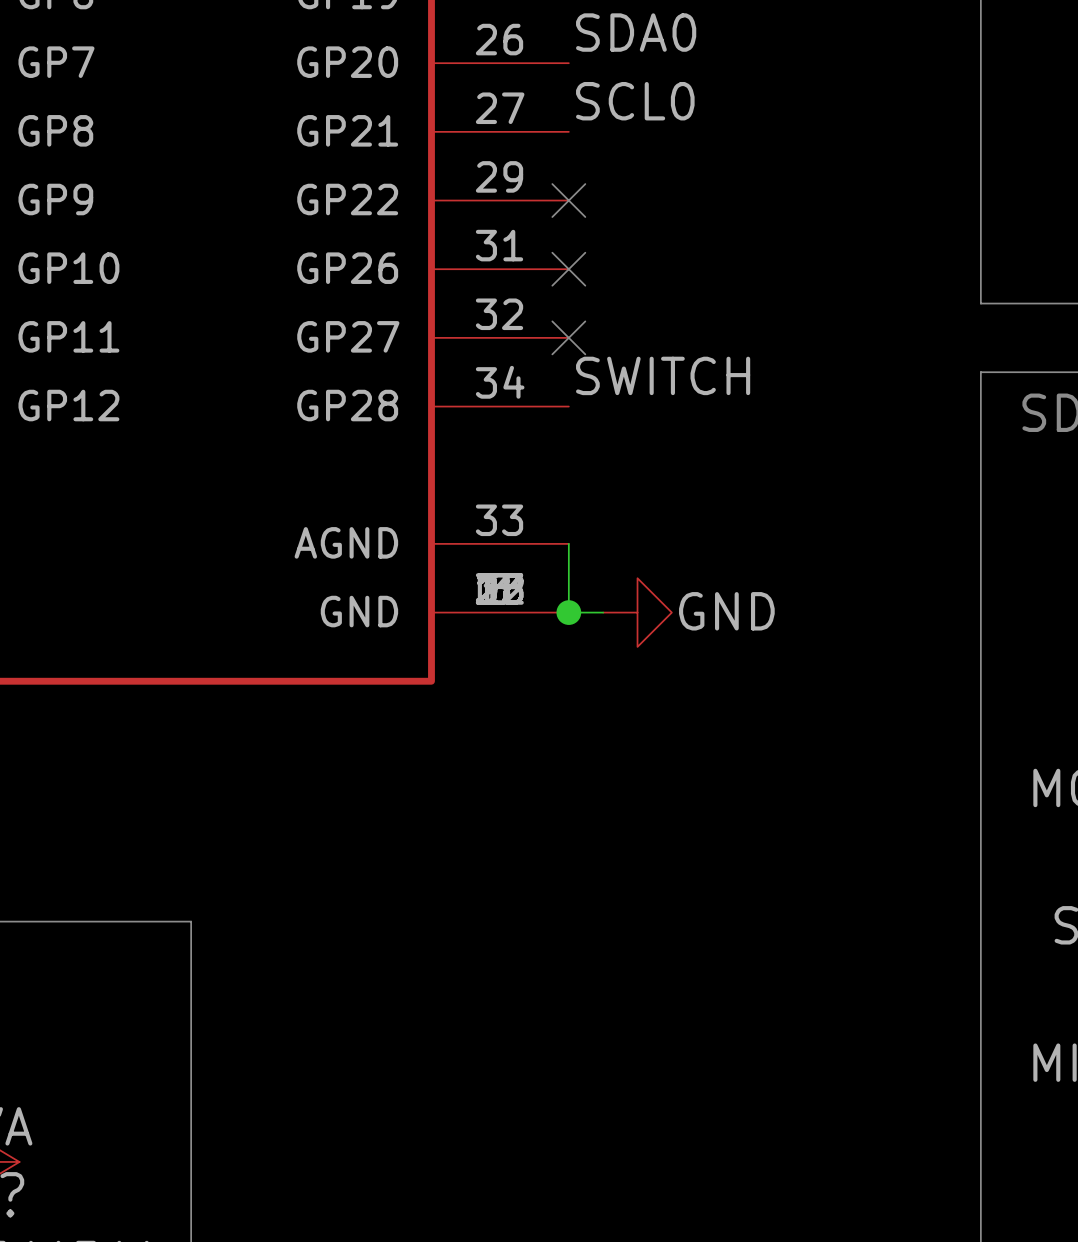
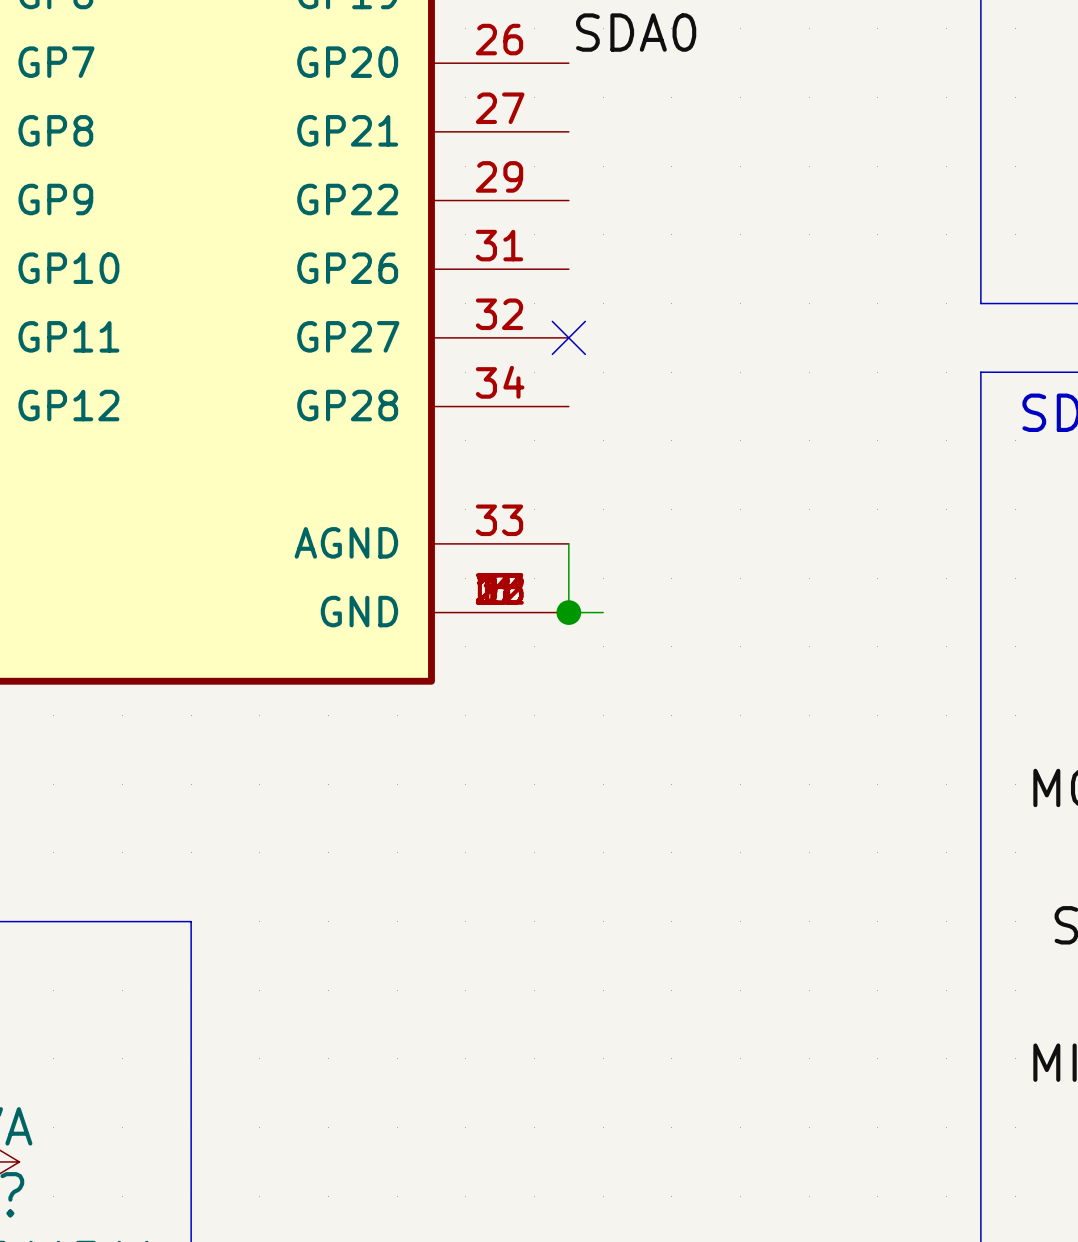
label: SCL0 (635, 101) -> none
no-connect mark: (568, 200) -> none
no-connect mark: (568, 269) -> none
label: SWITCH (663, 375) -> none
power symbol: GND (637, 612) -> none

